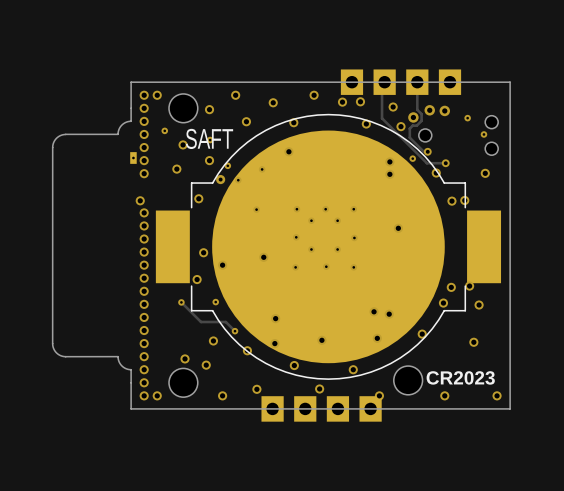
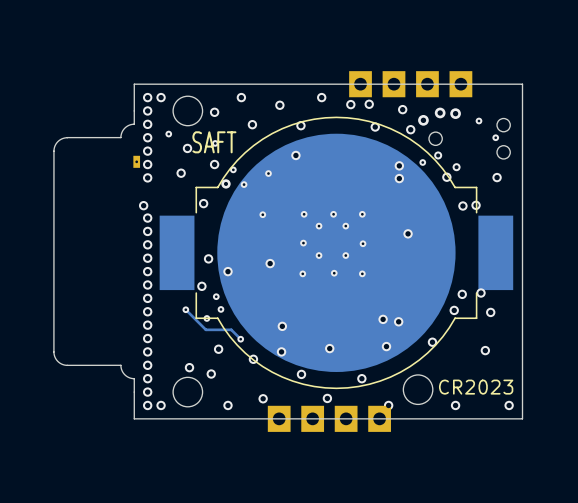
track: (417, 82) (417, 109) (421, 114) (421, 120) (409, 128) (409, 137) (423, 151) (427, 151) -> none
track: (382, 84) (382, 118) (426, 163) (445, 163) -> none
via: none -> (216, 296)
via: none -> (206, 318)

